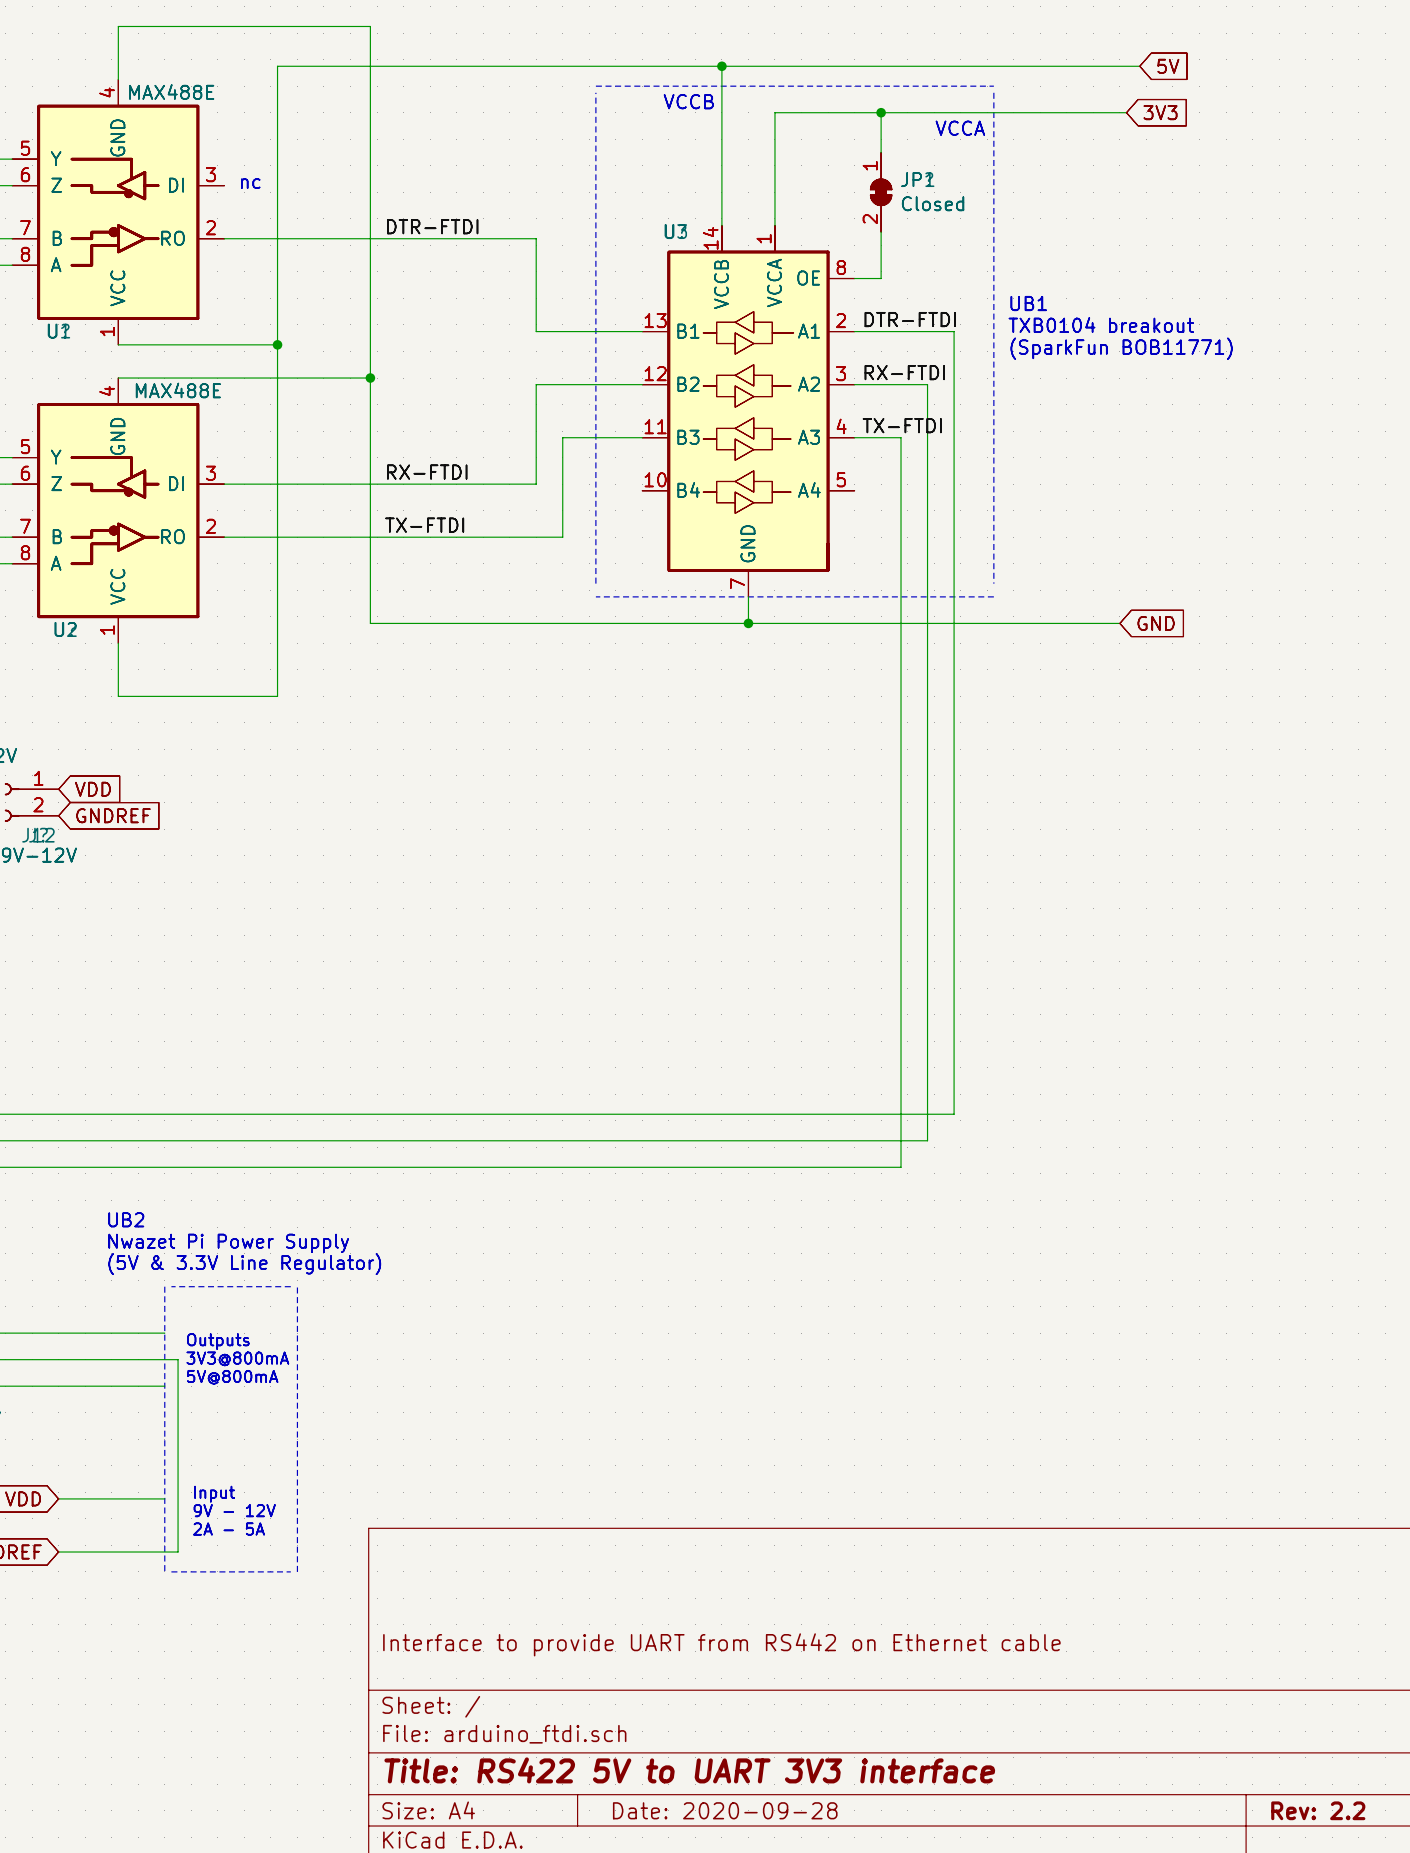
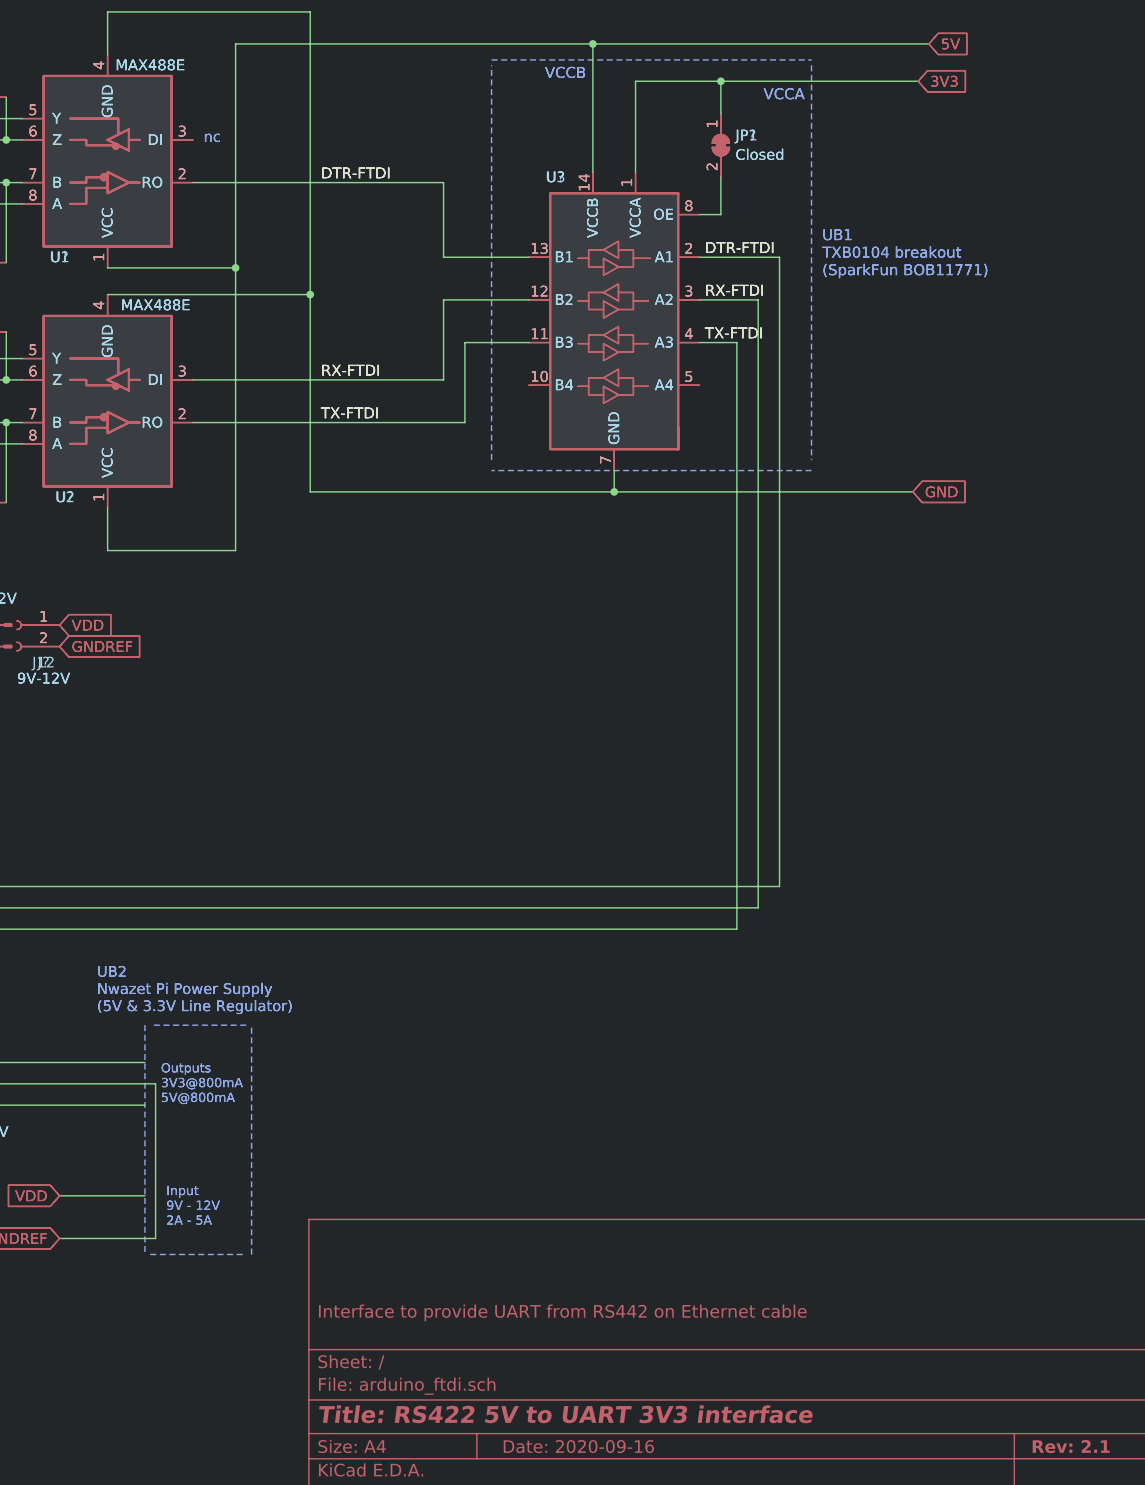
title block: Date: 2020-09-28 (725, 1810) -> Date: 2020-09-16 (578, 1446)
title block: Rev: 2.2 (1318, 1810) -> Rev: 2.1 (1071, 1446)

